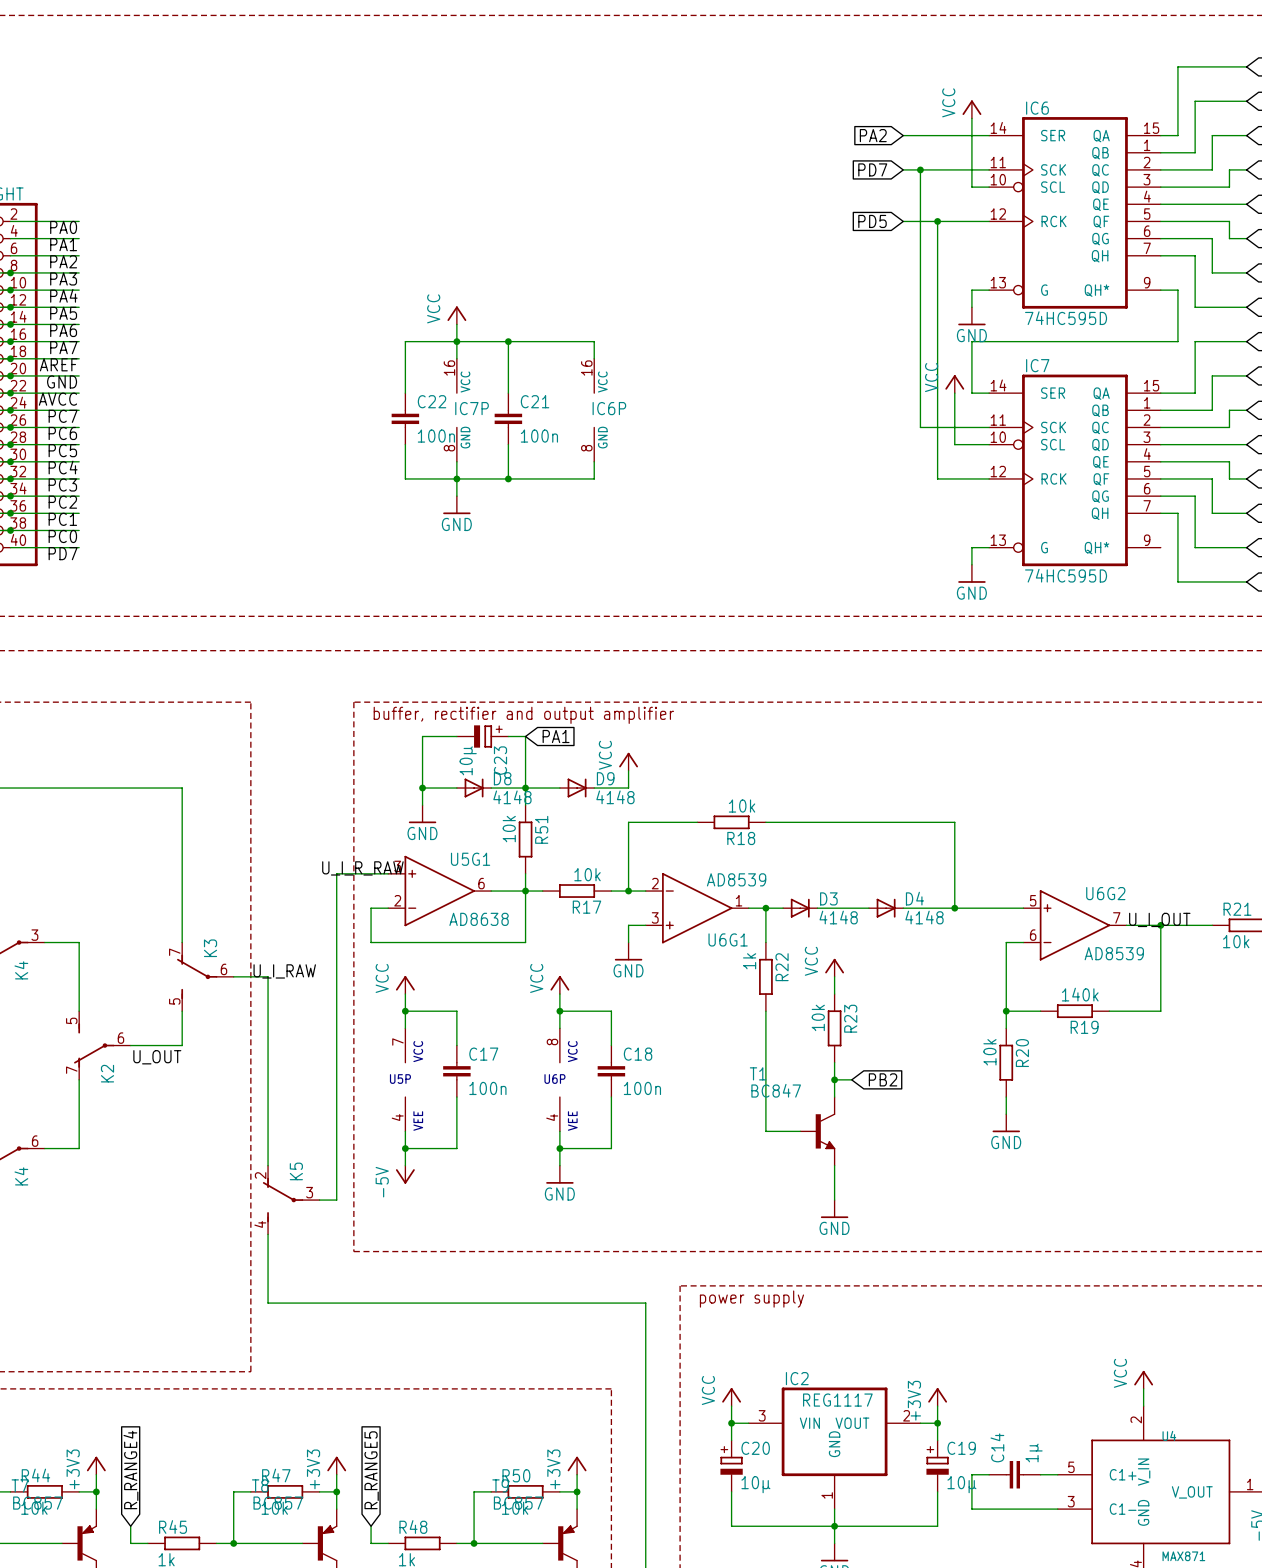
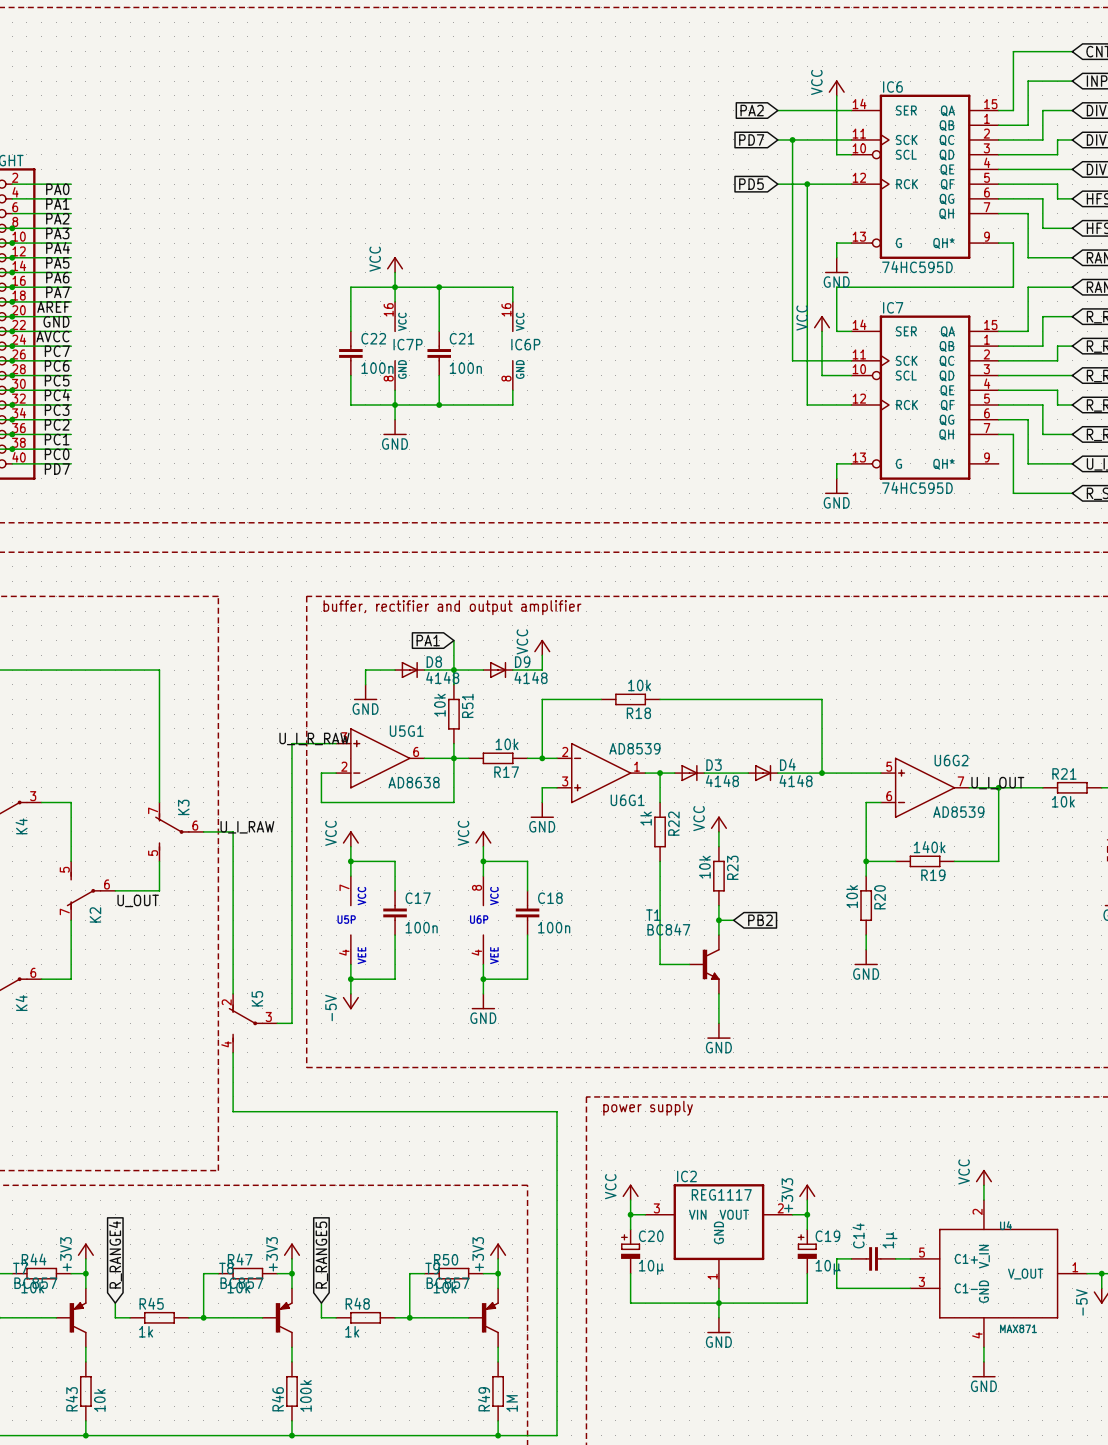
wire: (456, 736) (422, 736) (422, 788) -> none
C23: 10µ (482, 736) -> none
wire: (508, 736) (525, 736) (525, 753) -> none
global label rotation: 0° (556, 736) -> 180° (428, 640)
global label position: PA1 (556, 736) -> PA1 (428, 640)
junction: (422, 788) -> none

